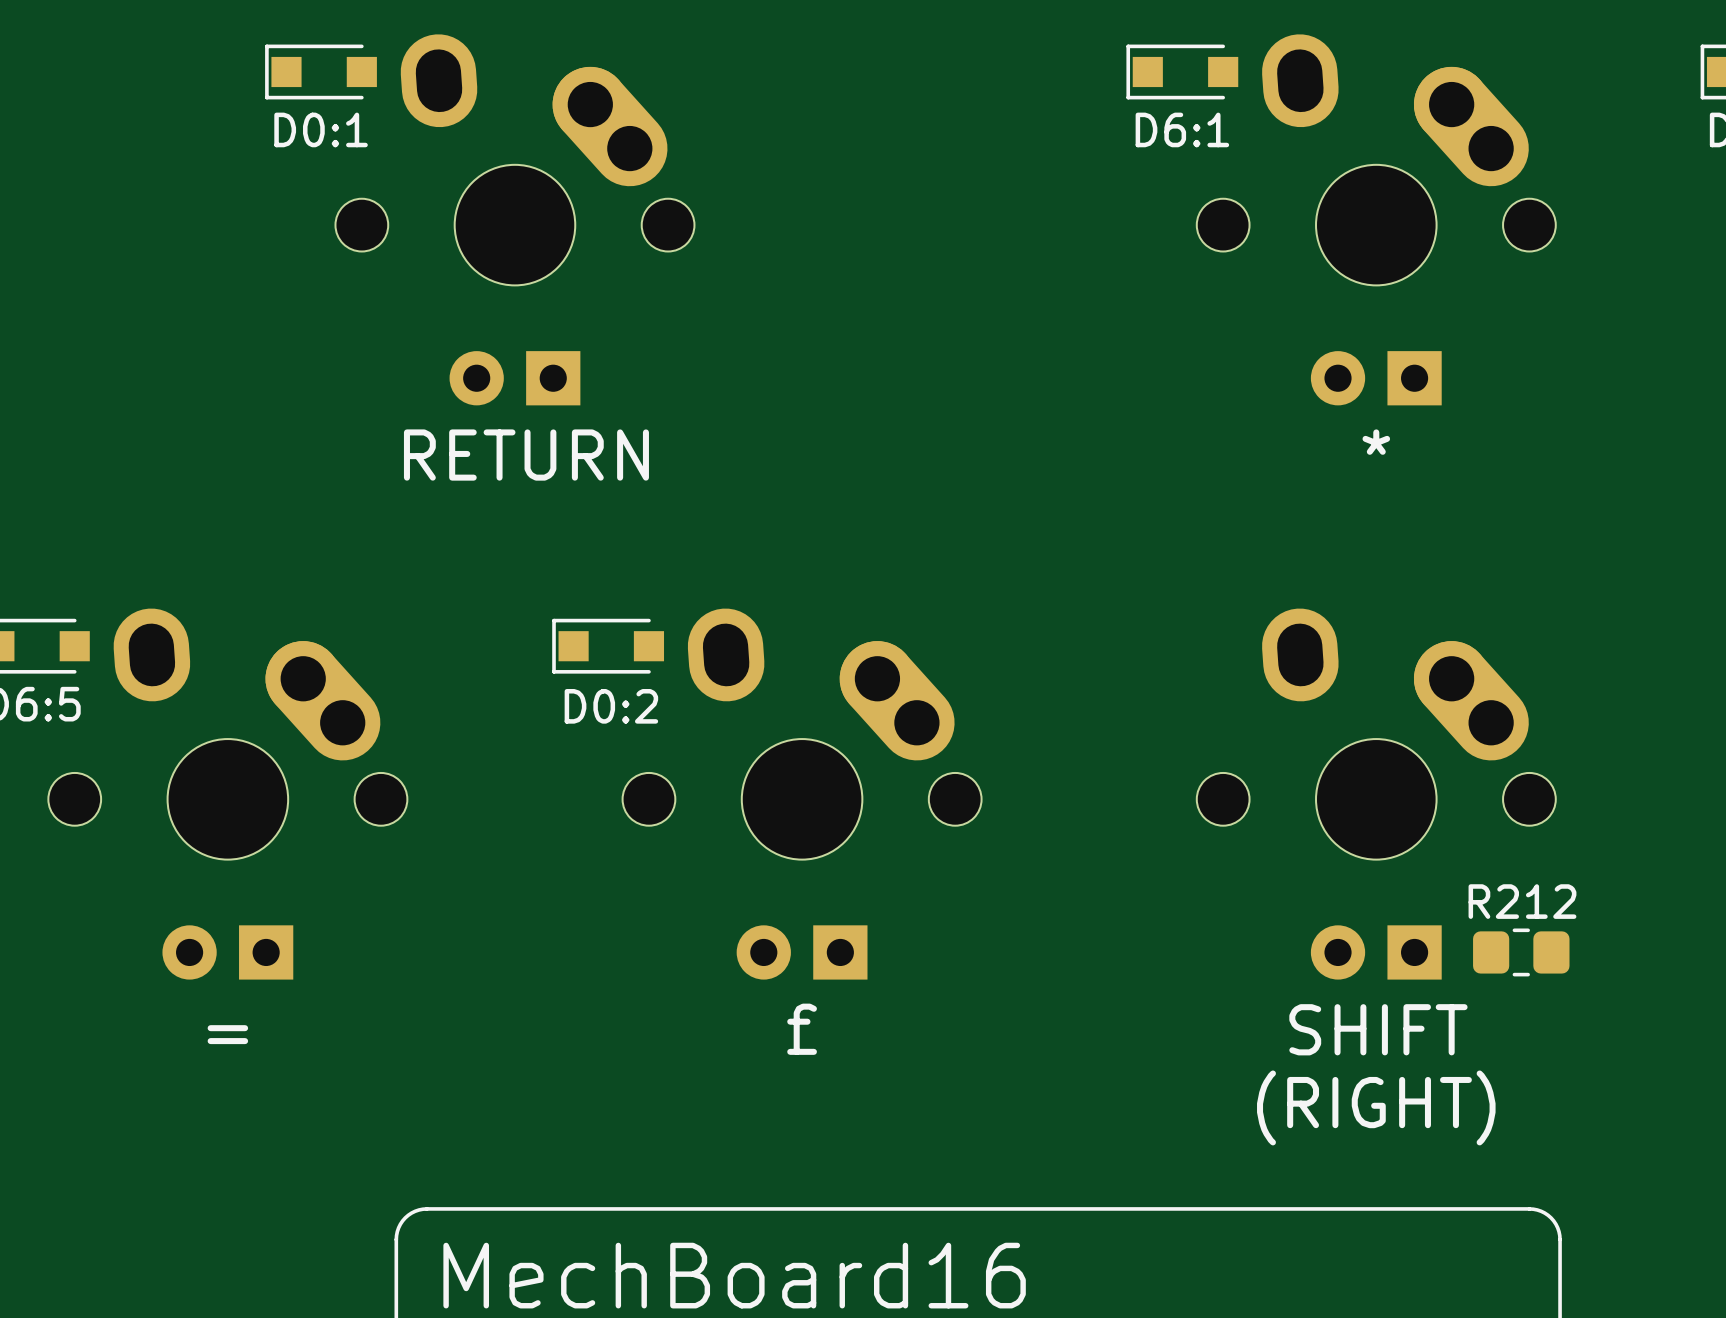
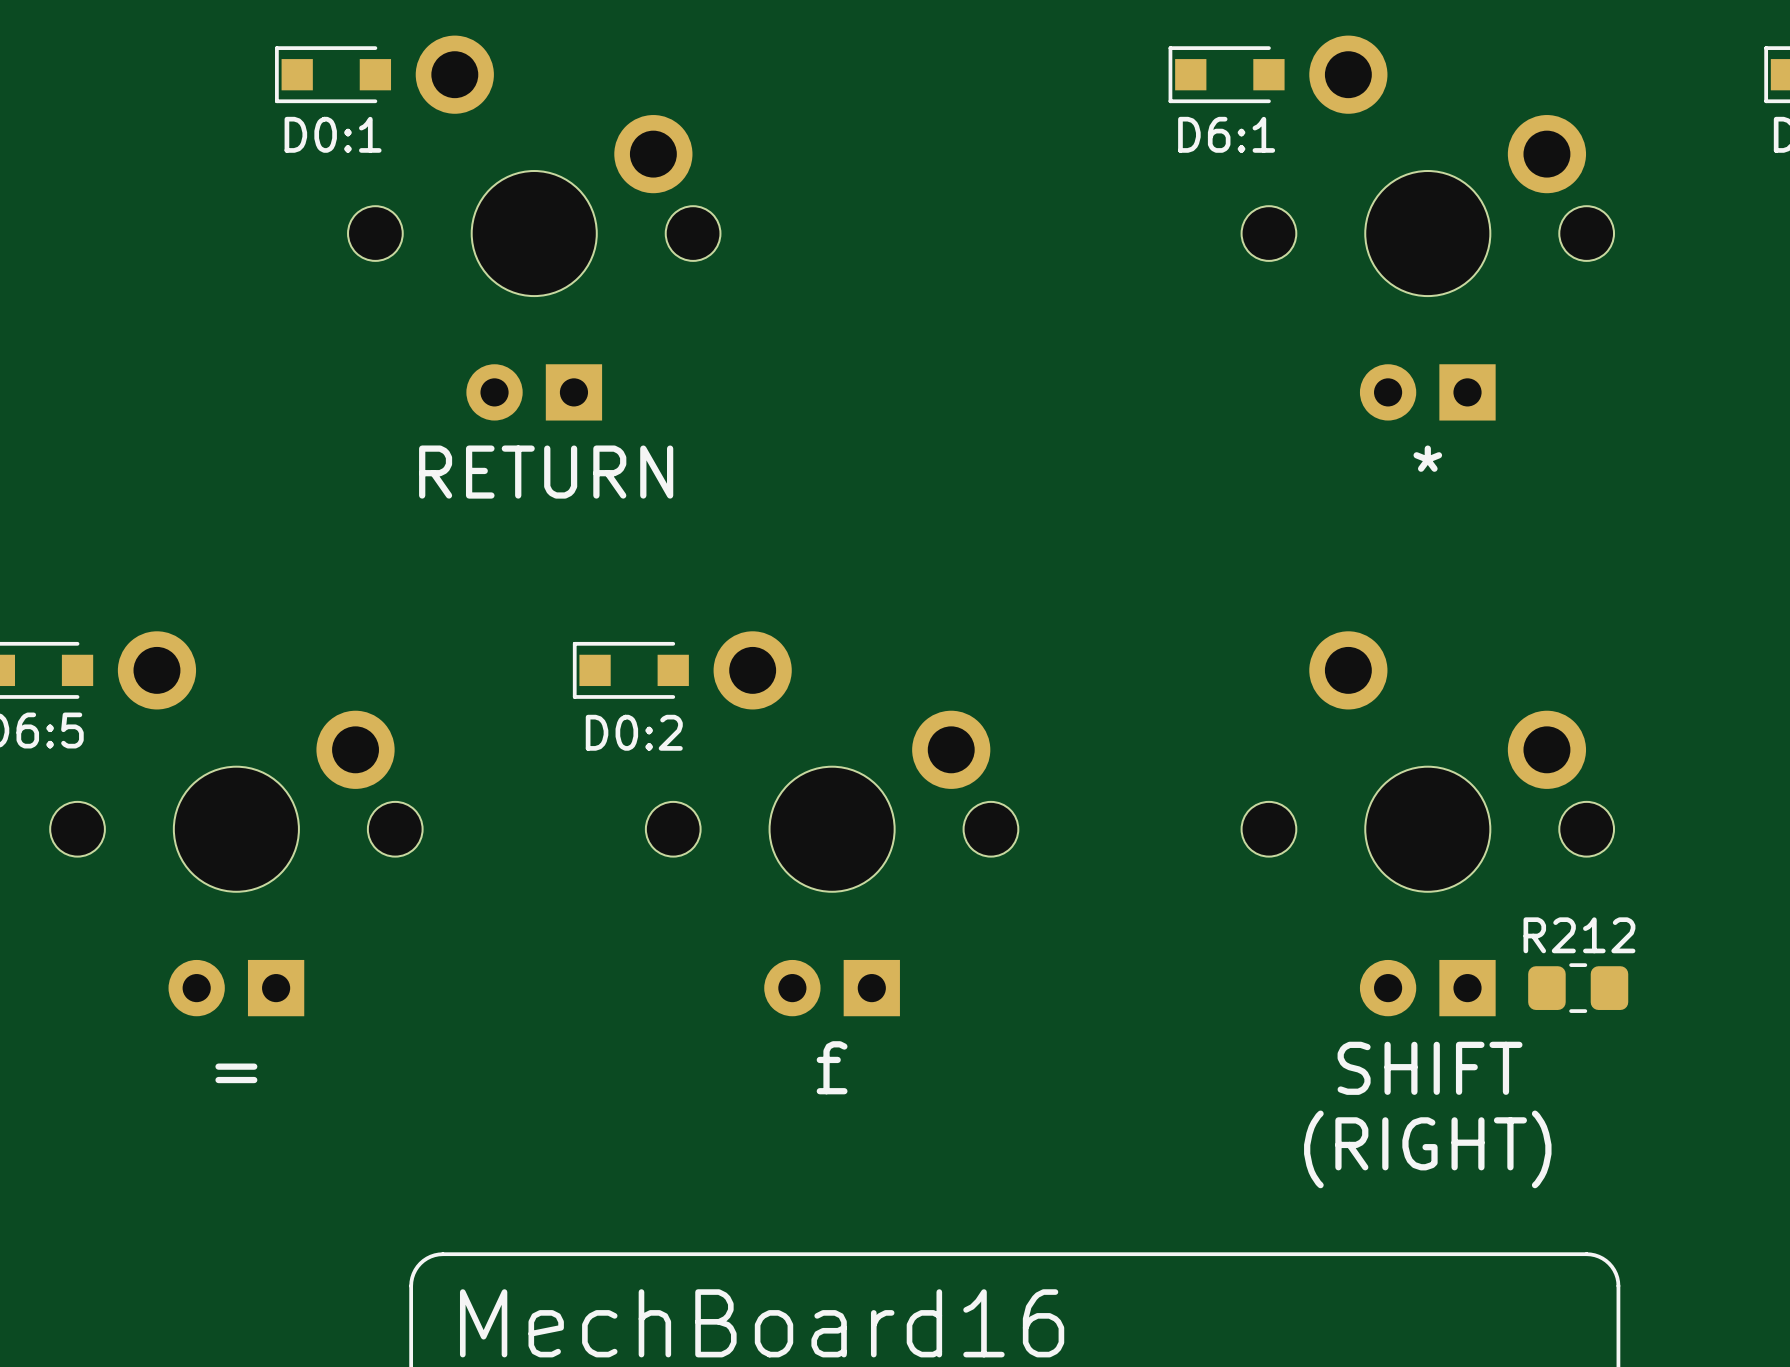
part footprint: [335, 34, 695, 286] -> [348, 35, 721, 297]
part footprint: [1196, 34, 1556, 286] -> [1241, 35, 1615, 297]
part footprint: [48, 608, 408, 860] -> [50, 631, 423, 892]
part footprint: [622, 608, 982, 860] -> [645, 631, 1019, 892]
part footprint: [1196, 608, 1556, 860] -> [1241, 631, 1615, 892]

